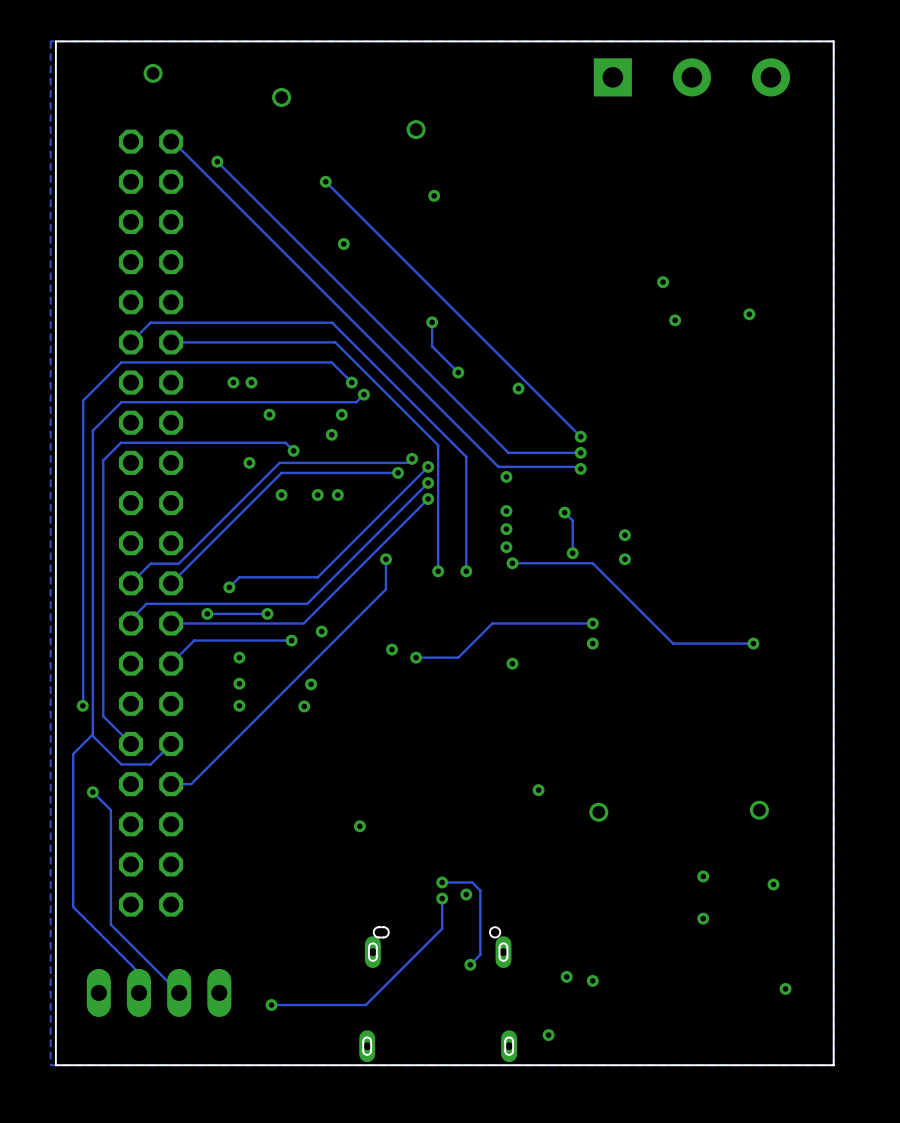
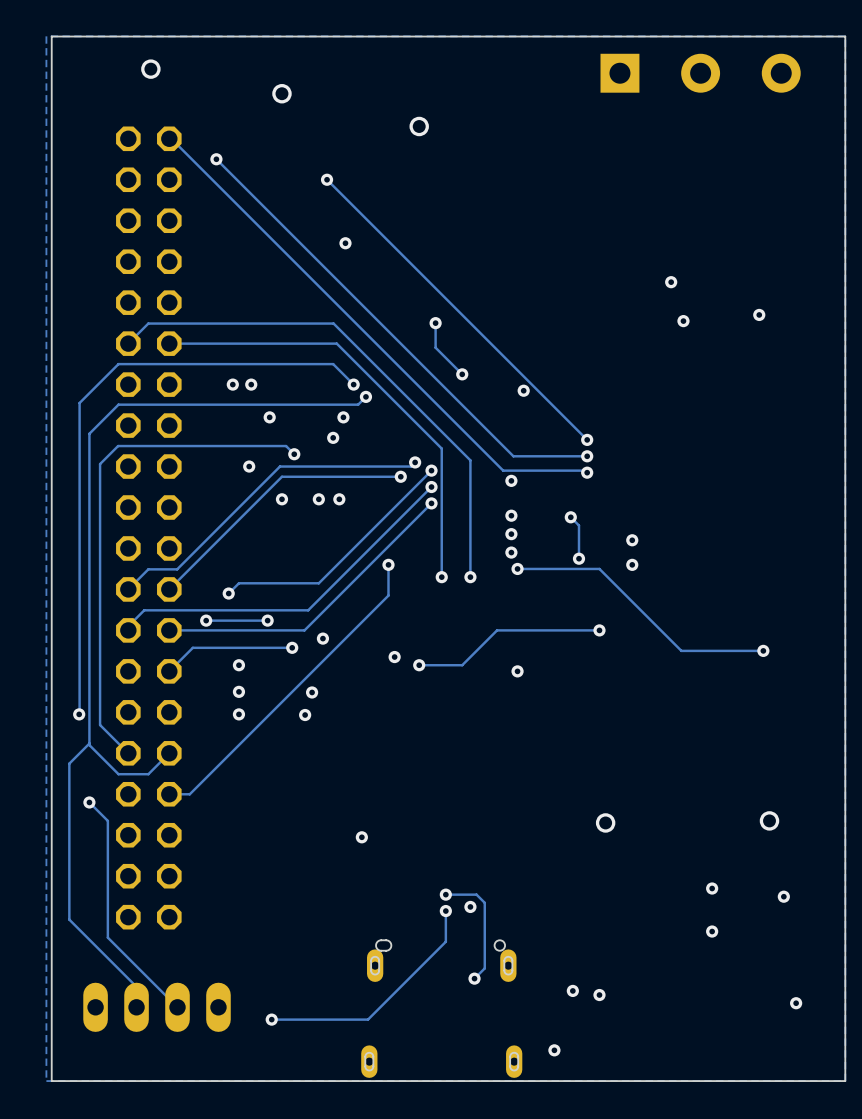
via: (434, 195) -> none
via: (592, 643) -> none
via: (538, 790) -> none

